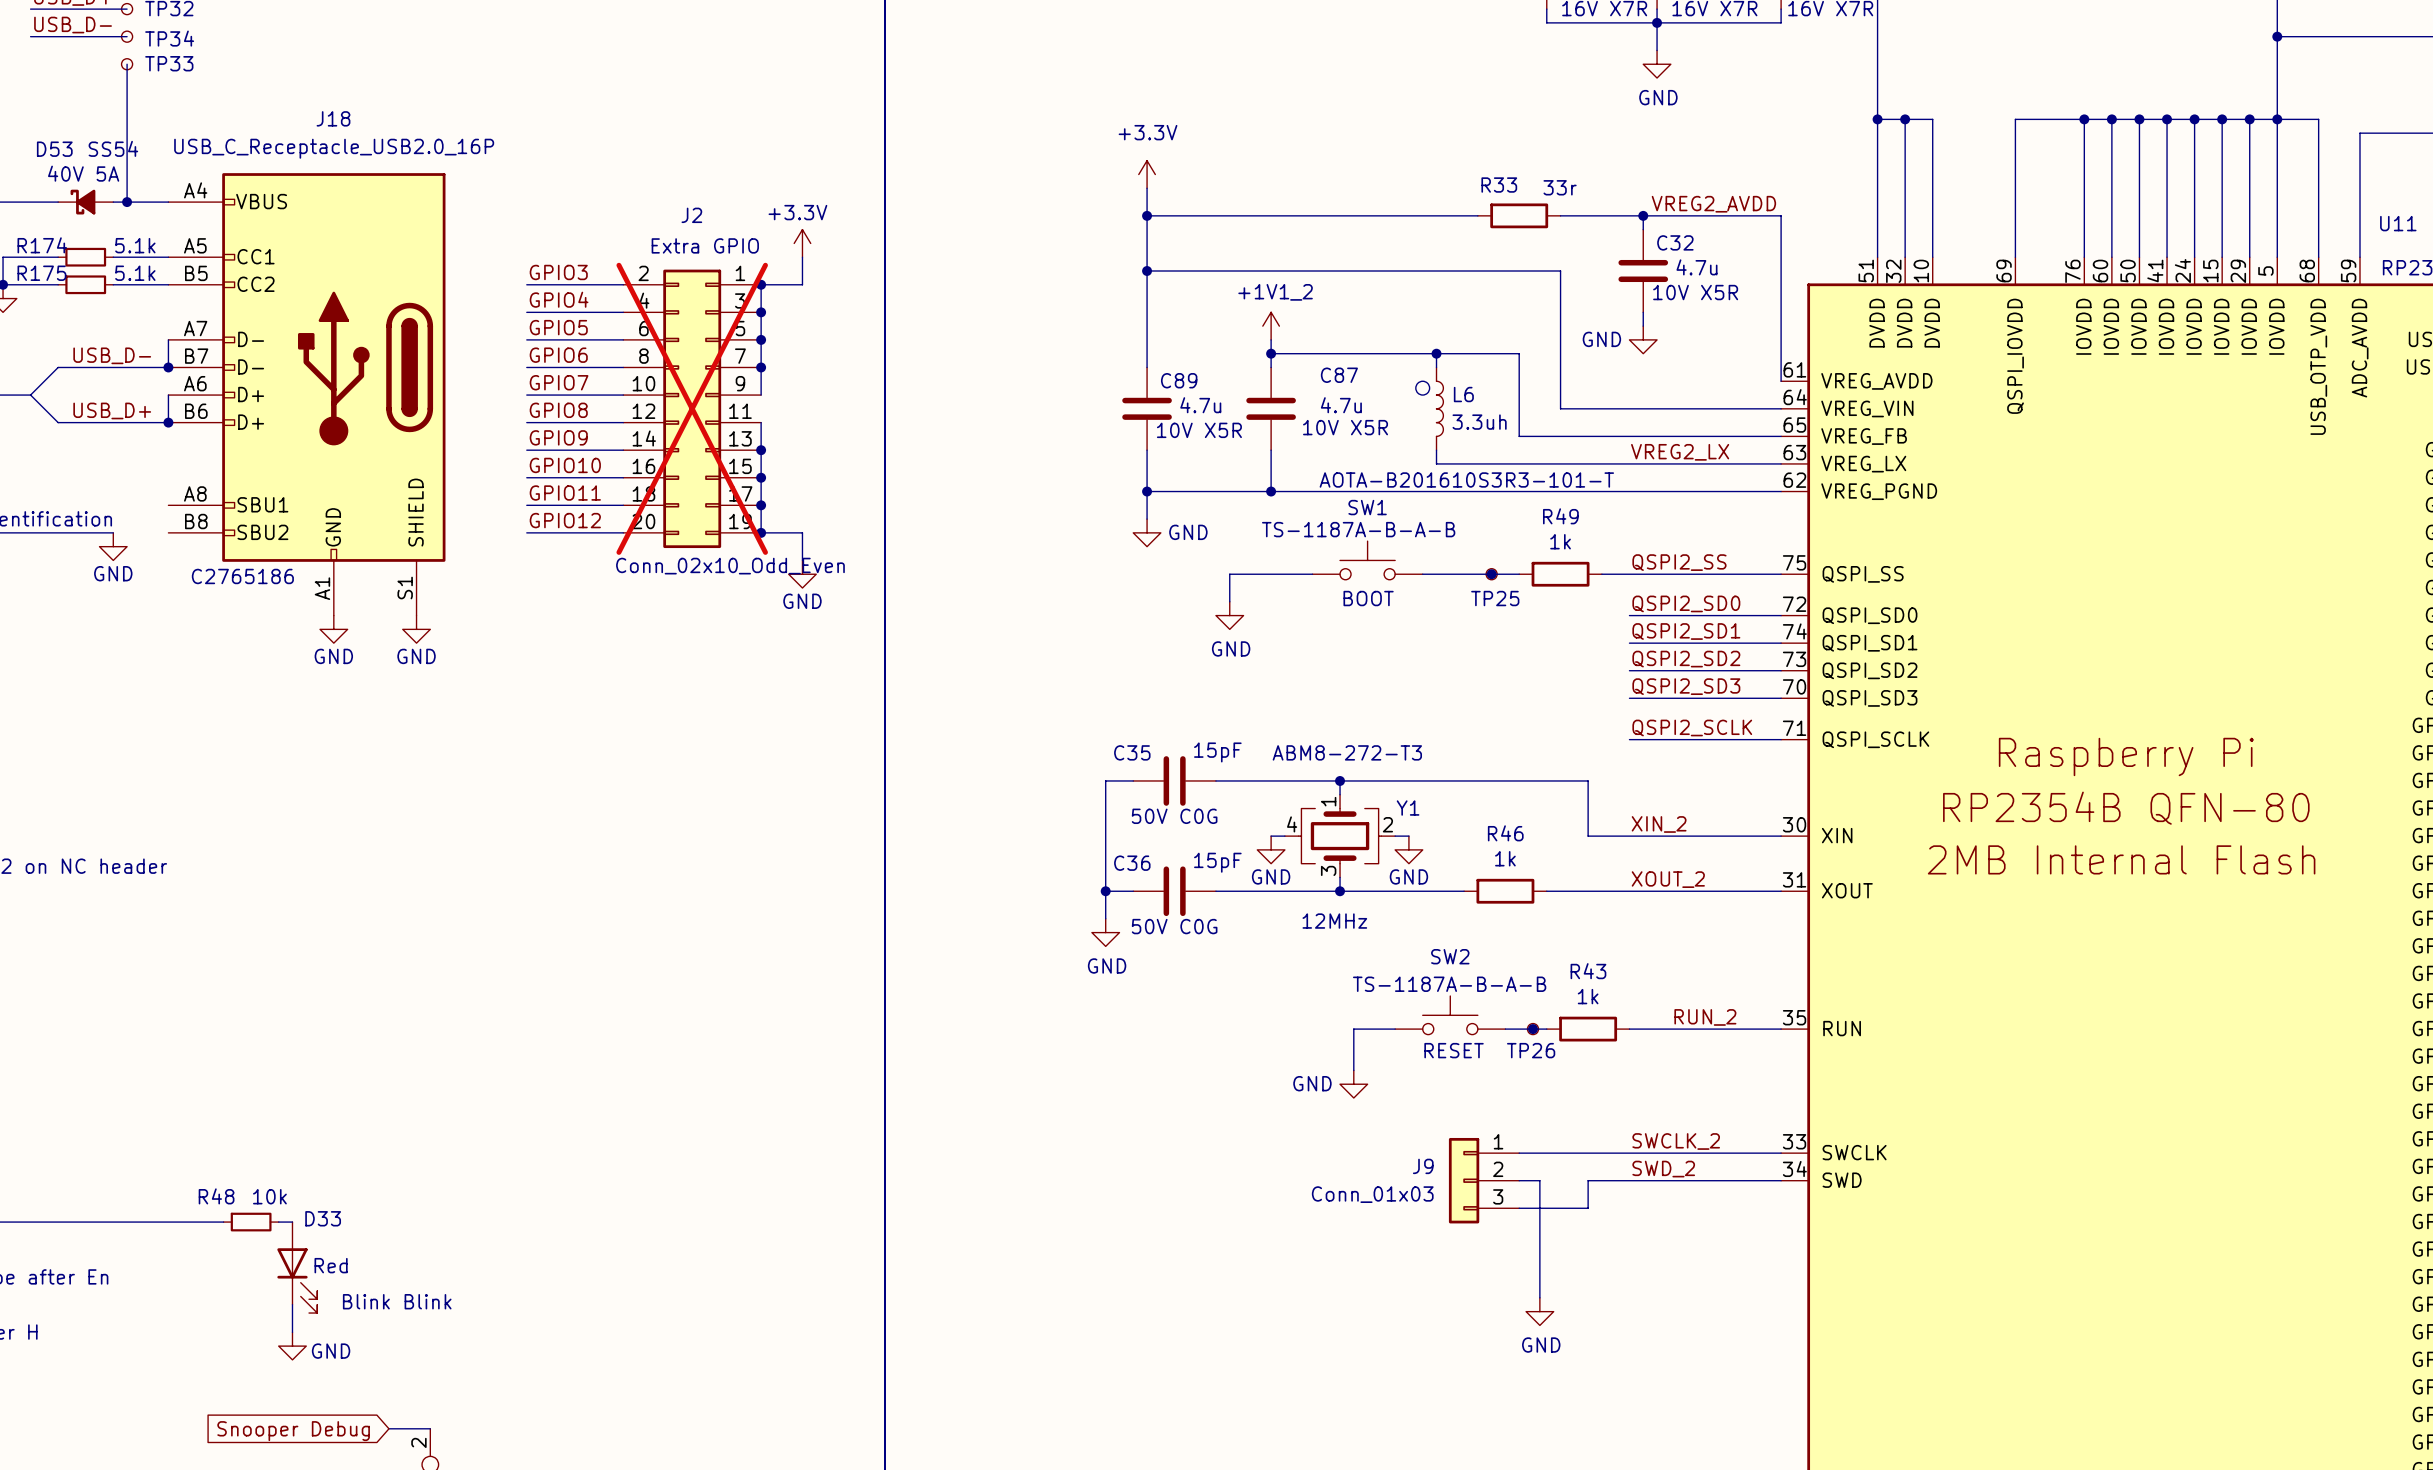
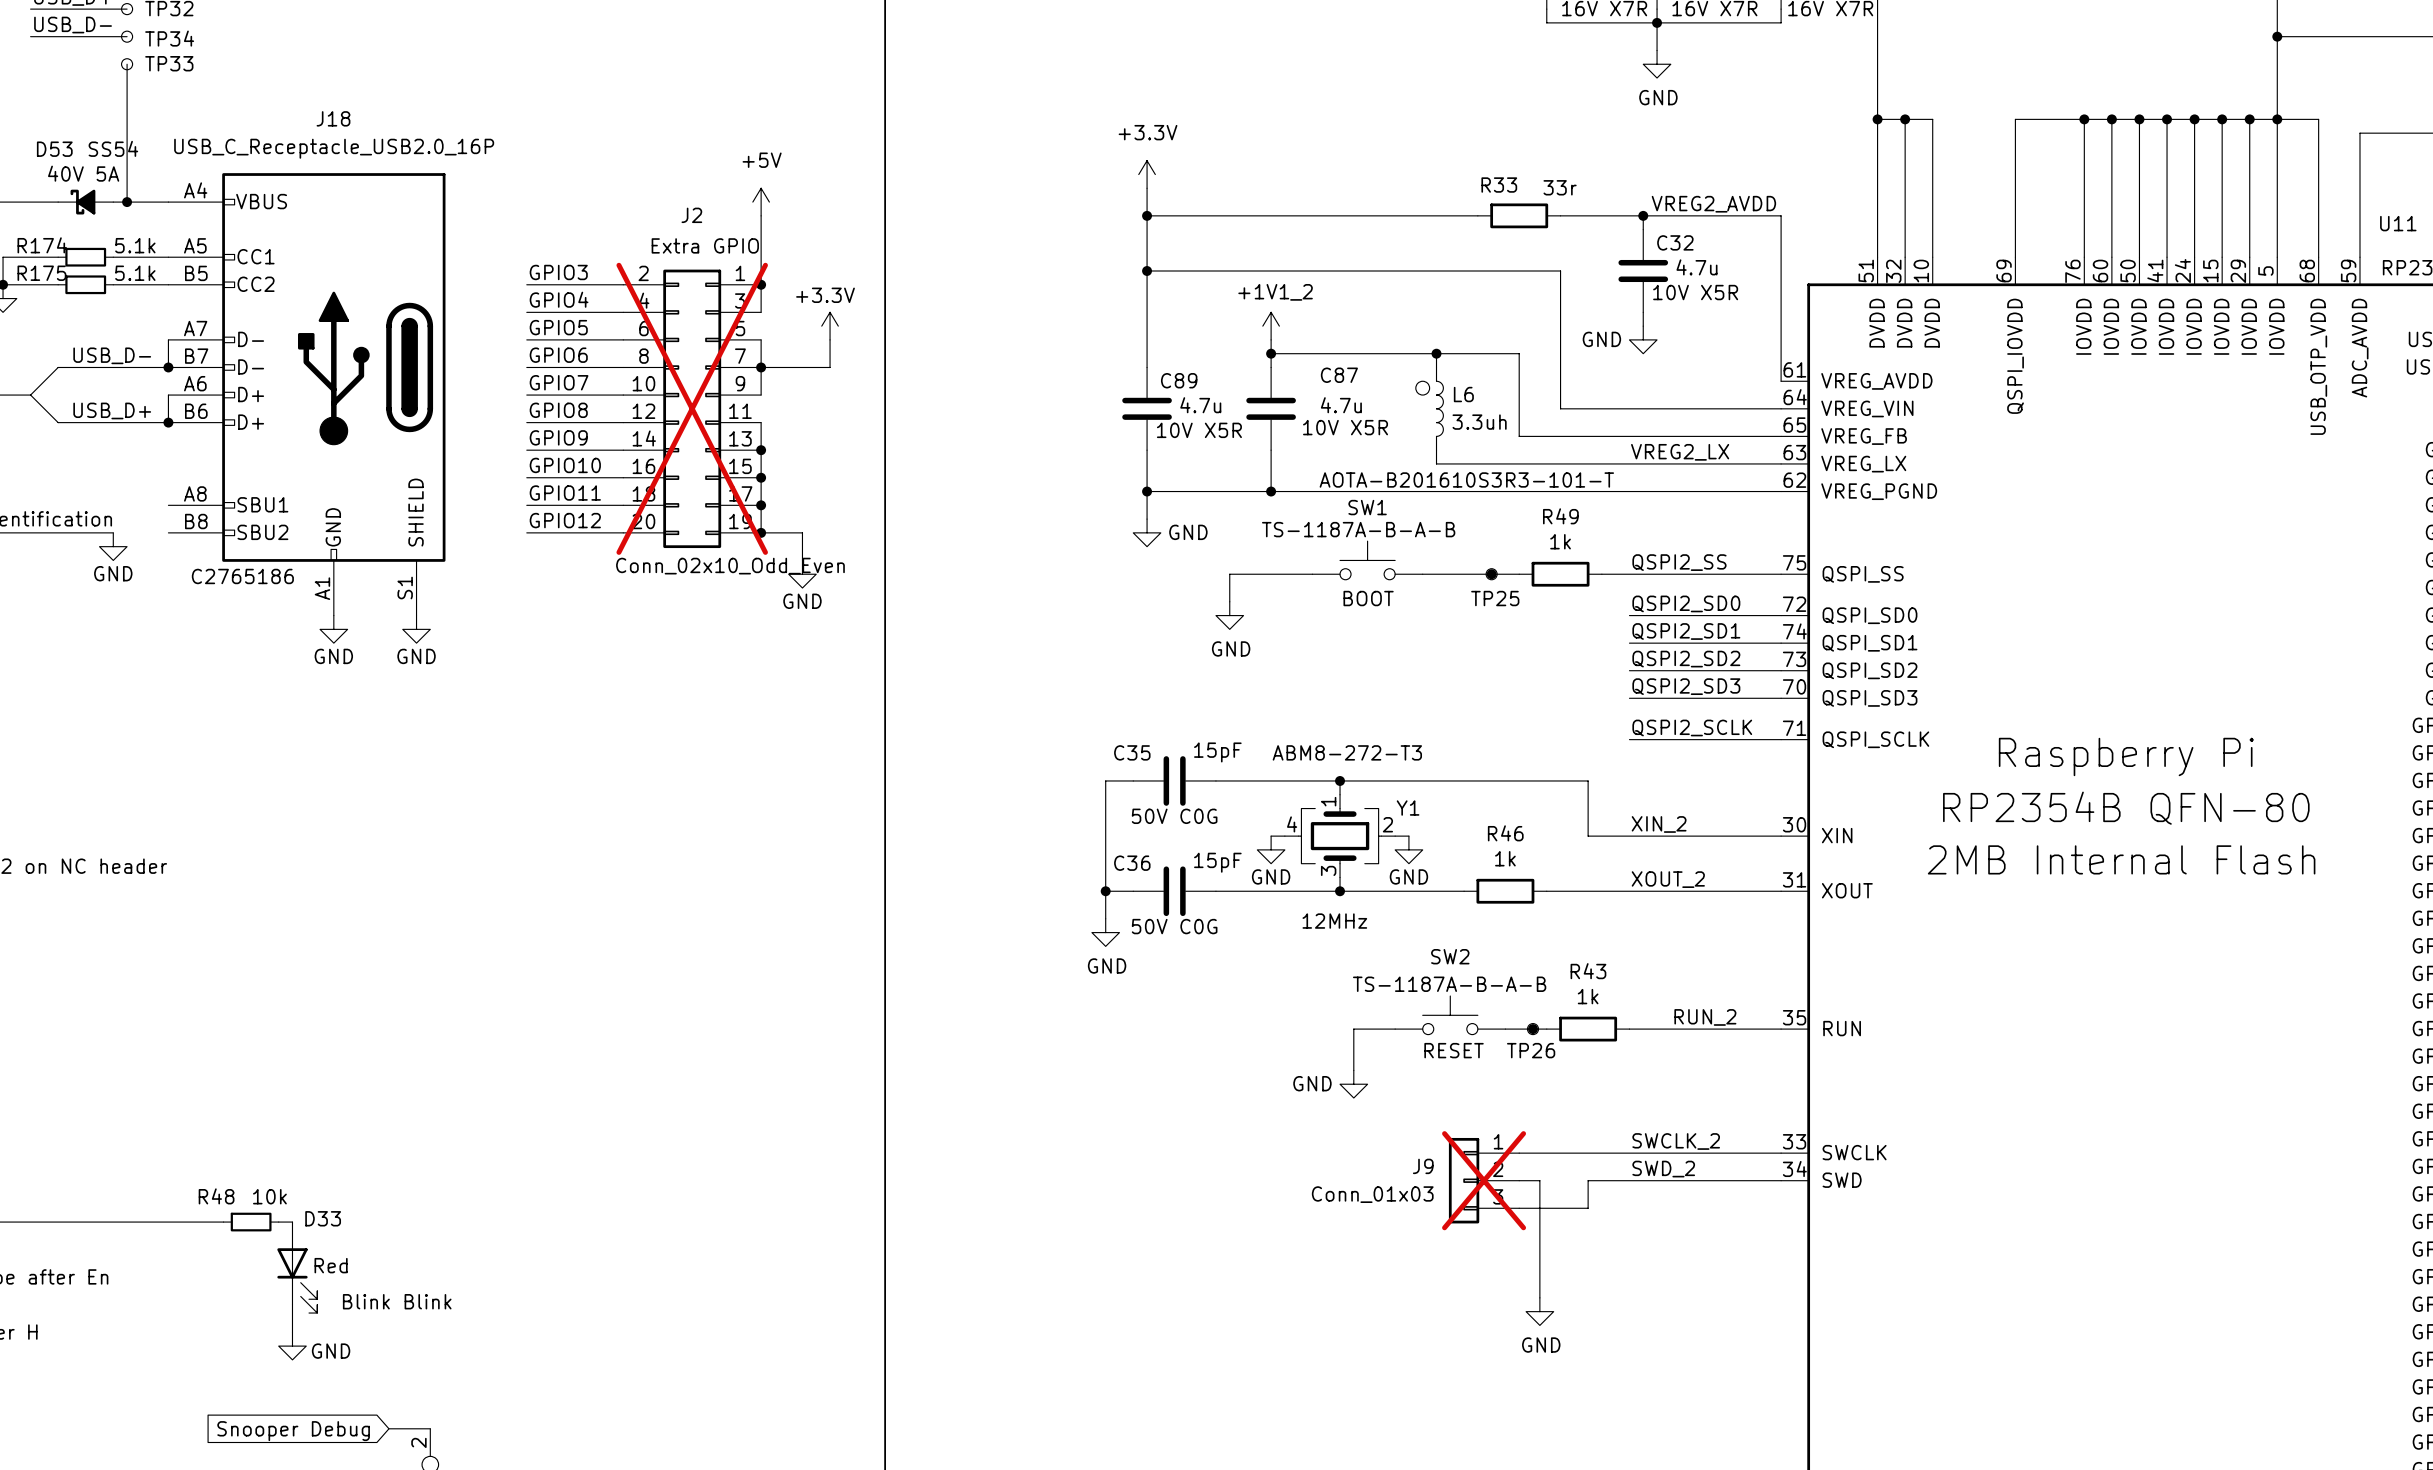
power symbol: none -> +5V (761, 202)
power symbol position: +3.3V (802, 243) -> +3.3V (830, 326)
wire: (802, 257) (802, 284) (761, 284) -> (761, 215) (761, 284)
wire: (761, 312) (761, 339) -> none
junction: (761, 312) -> none
junction: (761, 339) -> none
wire: none -> (830, 339) (830, 367) (761, 367)
J9 do-not-place cross: none -> (1484, 1180)

